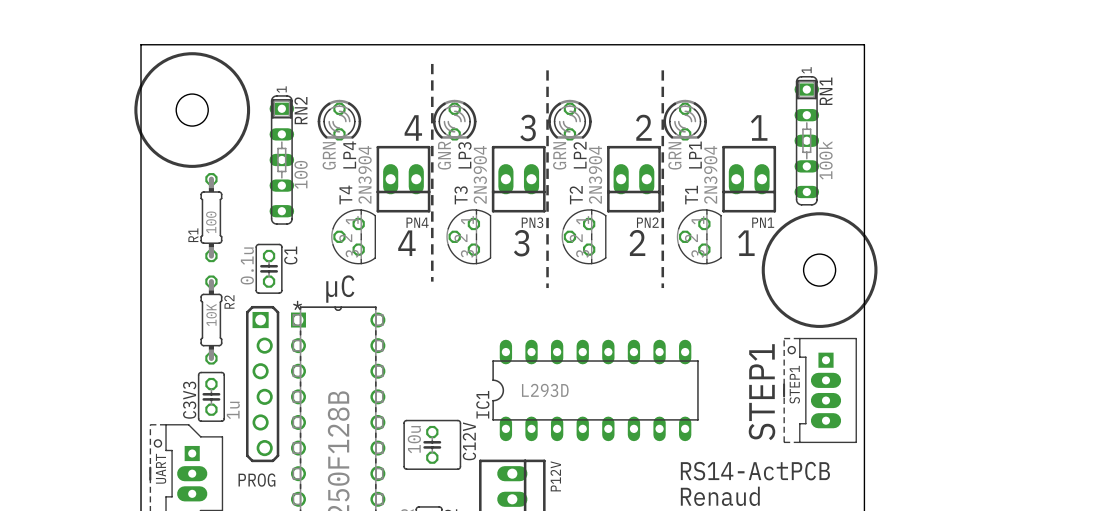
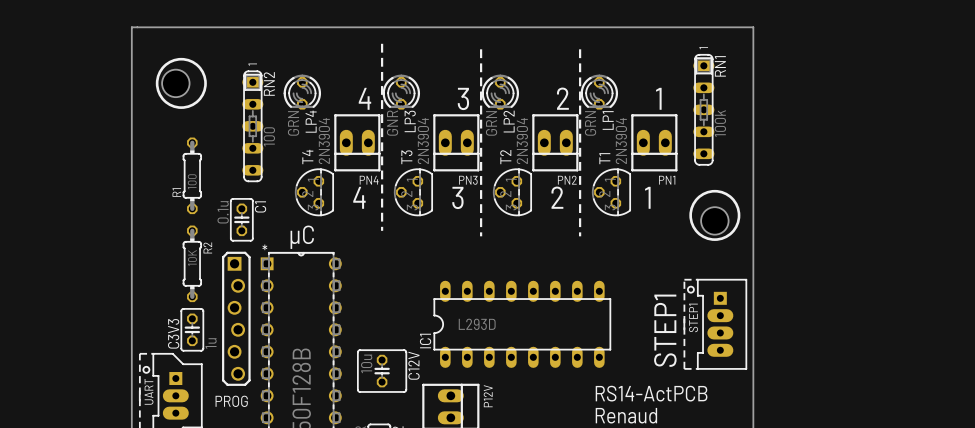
drawing shape: [134, 52, 251, 168] -> [155, 57, 207, 109]
drawing shape: [761, 212, 878, 328] -> [689, 189, 741, 241]

